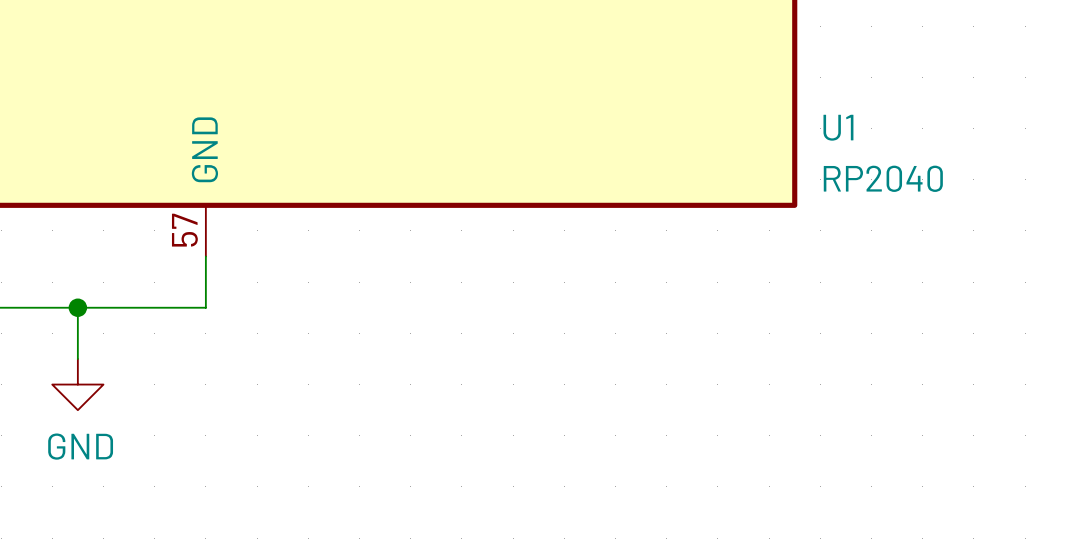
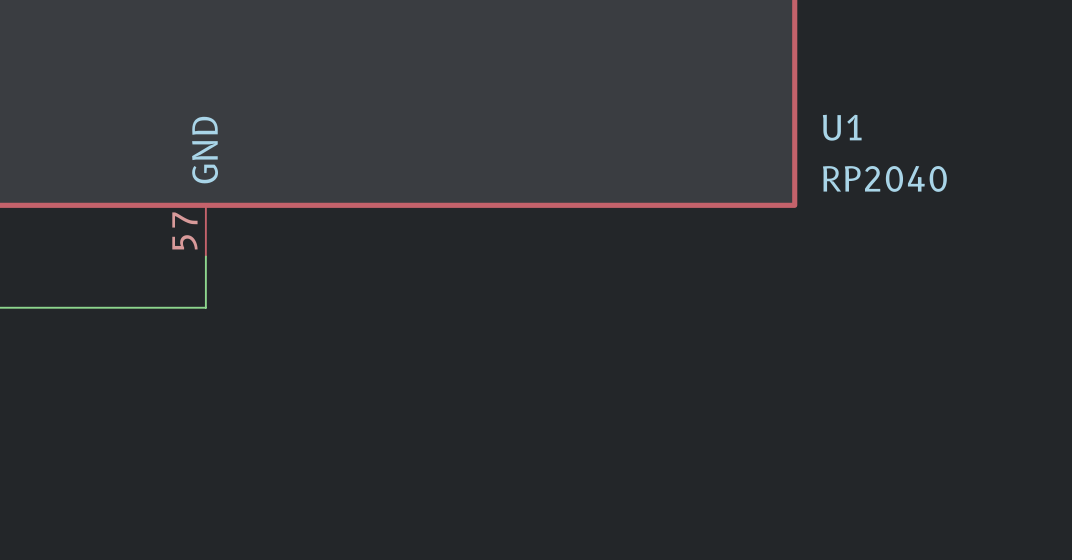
wire: (77, 307) (77, 358) -> none
junction: (77, 307) -> none
power symbol: GND (77, 384) -> none

